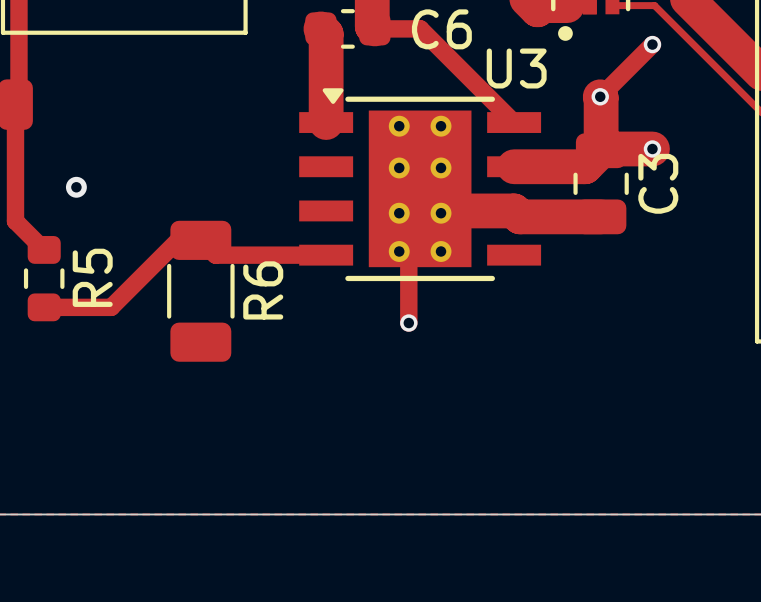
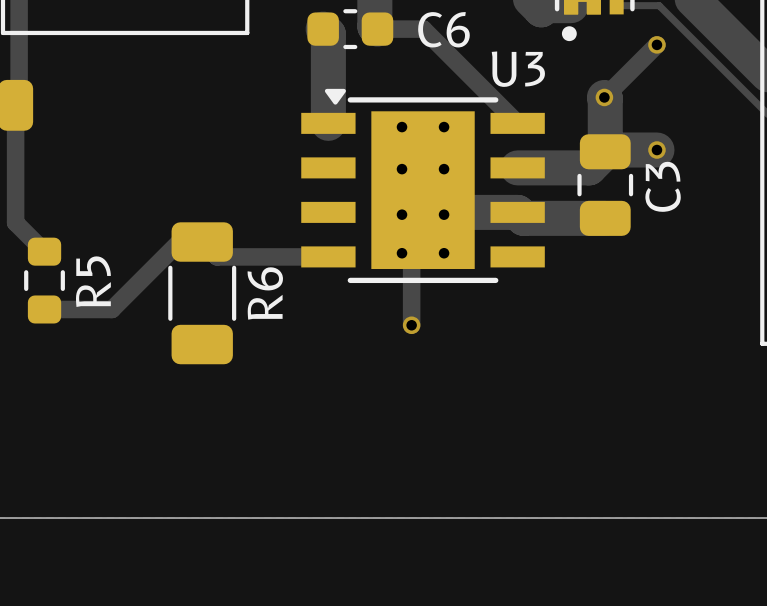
via: (76, 187) -> none

